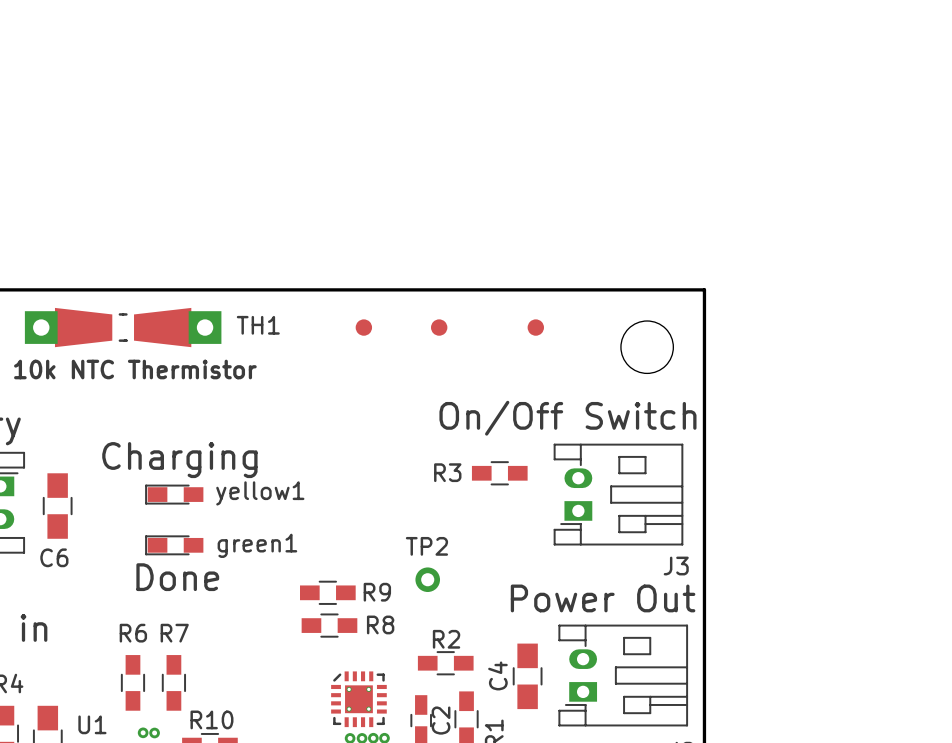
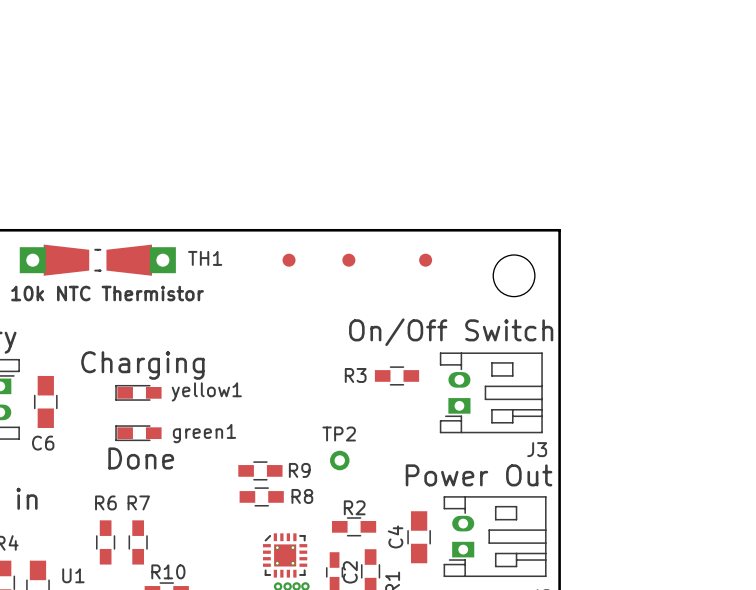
via: (143, 732) -> none
via: (154, 732) -> none

